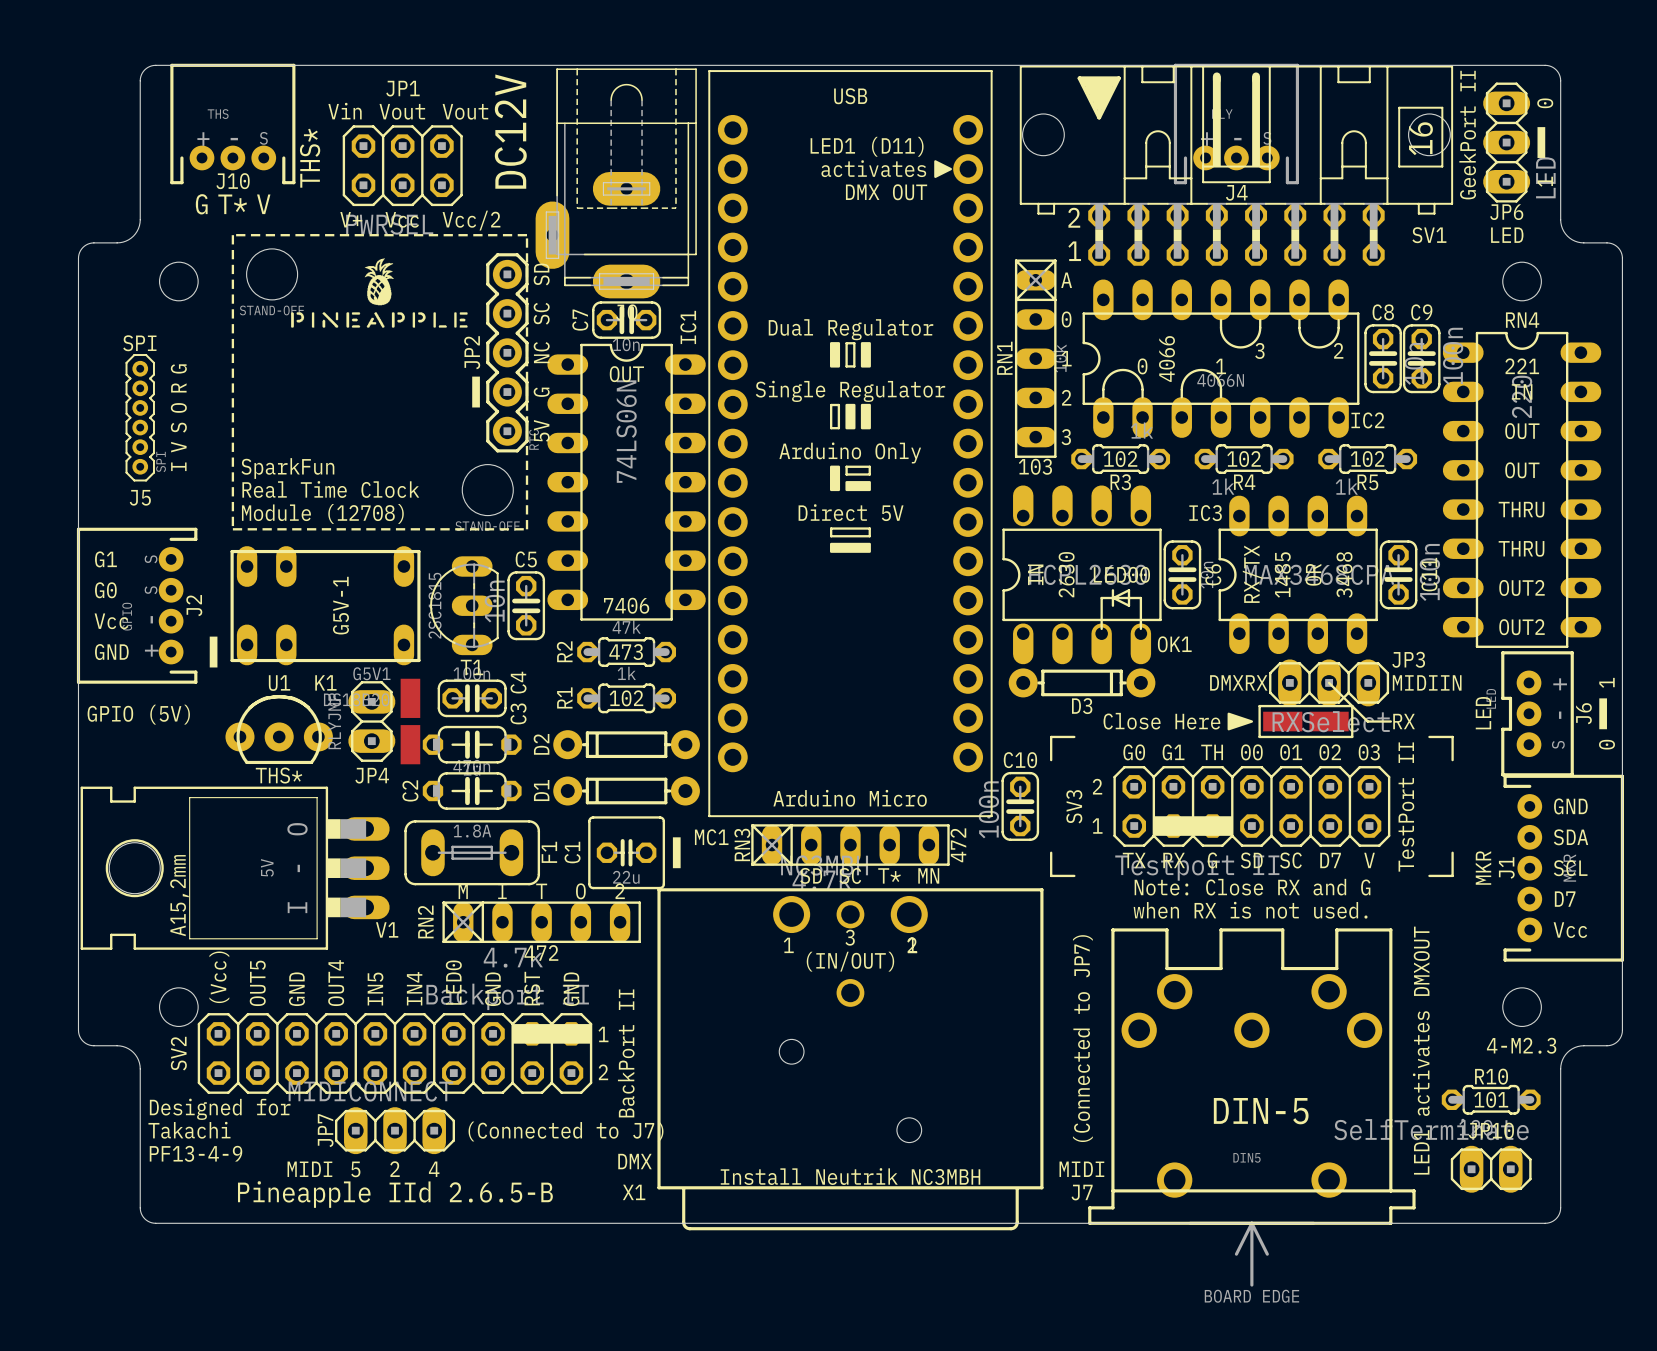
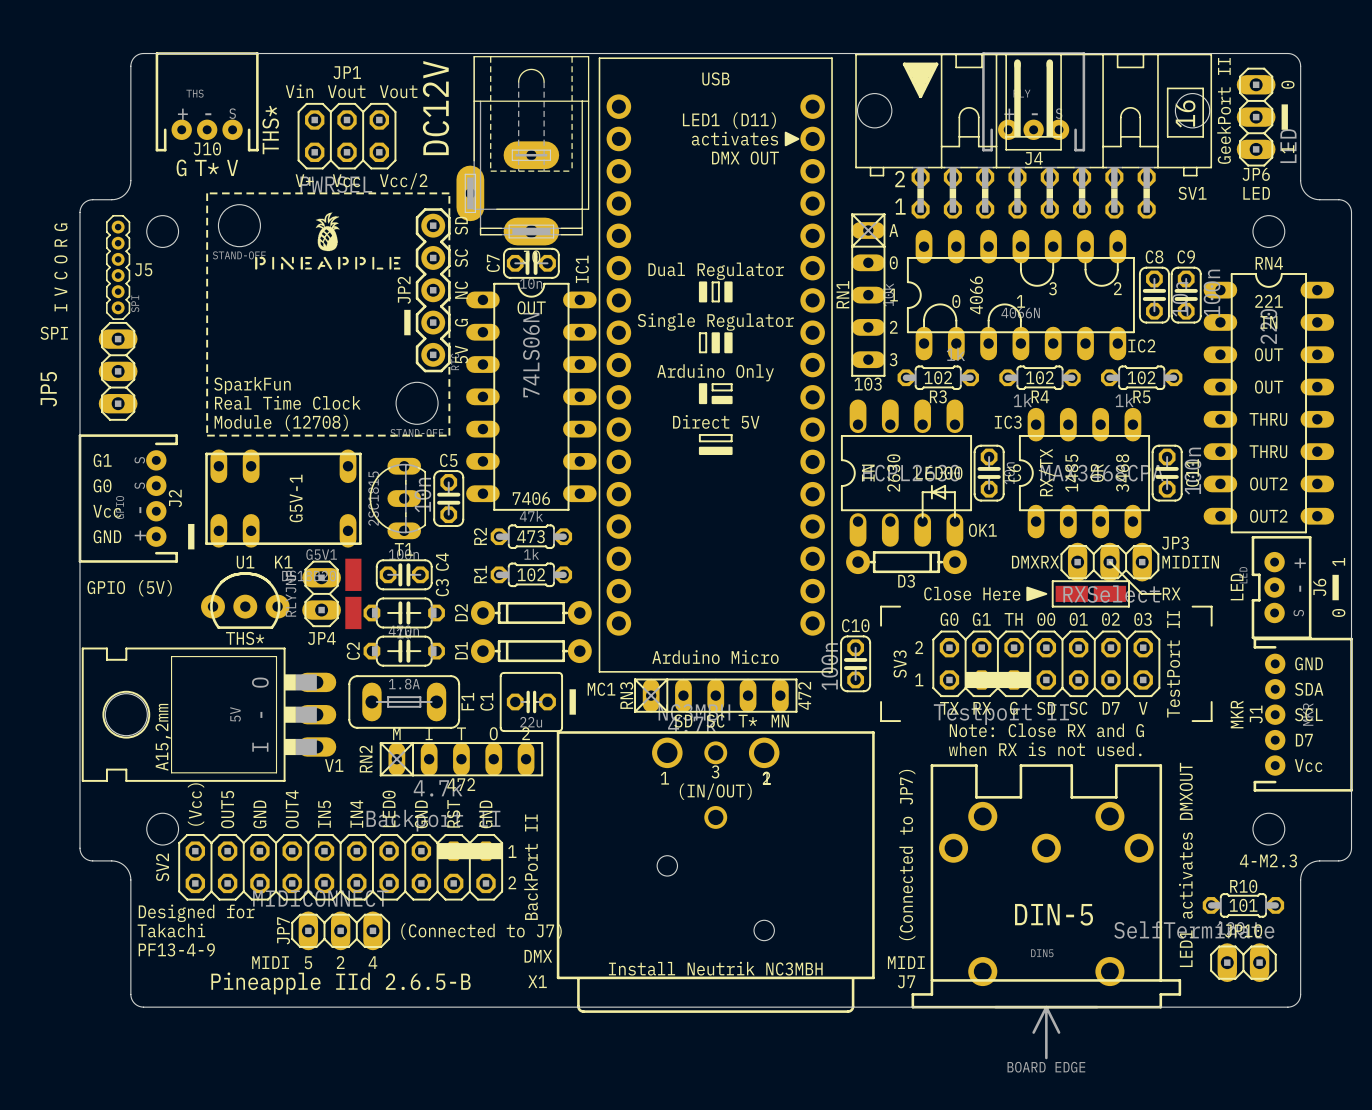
text: none -> C (60, 275)
text position: SPI (139, 343) -> SPI (54, 333)
text position: G (178, 368) -> G (60, 227)
text position: R (178, 387) -> R (60, 242)
text position: O (178, 407) -> O (60, 259)
J5 position: (140, 417) -> (118, 267)
text: S (178, 427) -> none
text position: V (178, 447) -> V (60, 291)
JP5: none -> (118, 371)
text position: I (178, 466) -> I (60, 307)
J5 name position: J5 (140, 497) -> J5 (143, 269)

